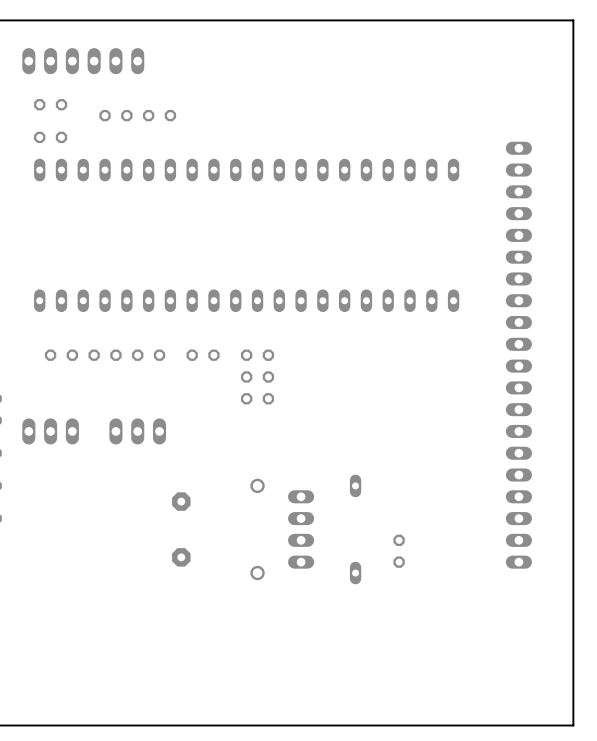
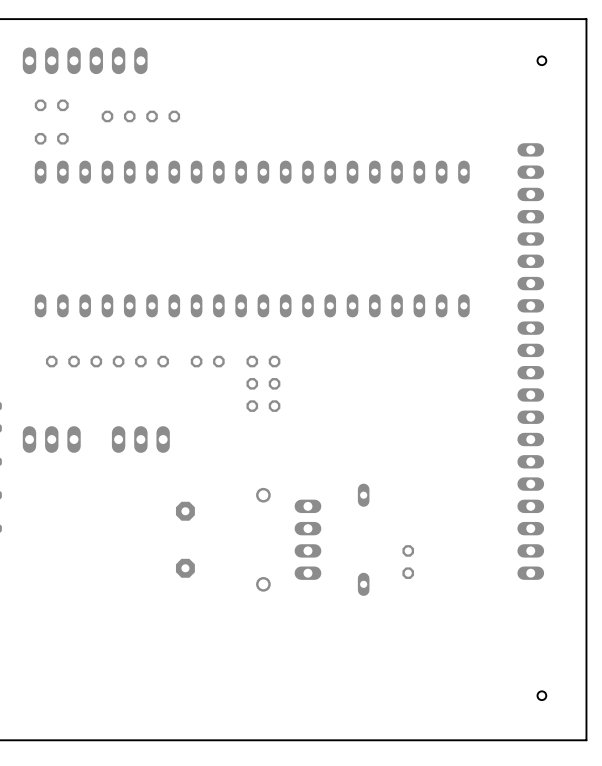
hole: none -> (541, 60)
hole: none -> (541, 695)

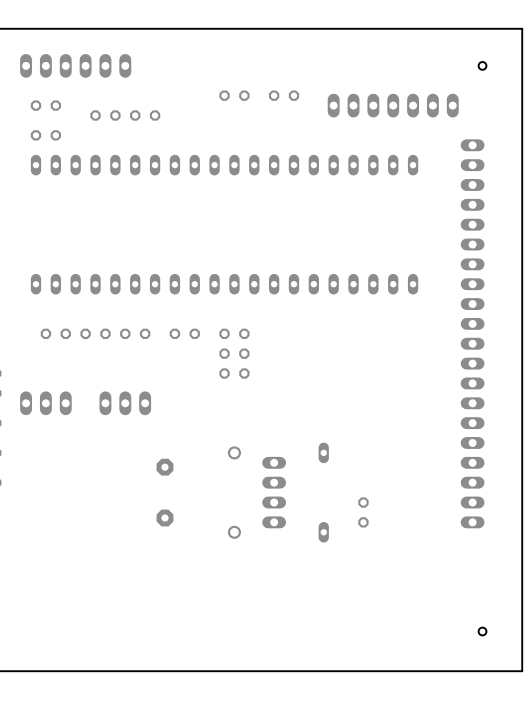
part: none -> (234, 95)
part: none -> (284, 95)
part: none -> (393, 105)

